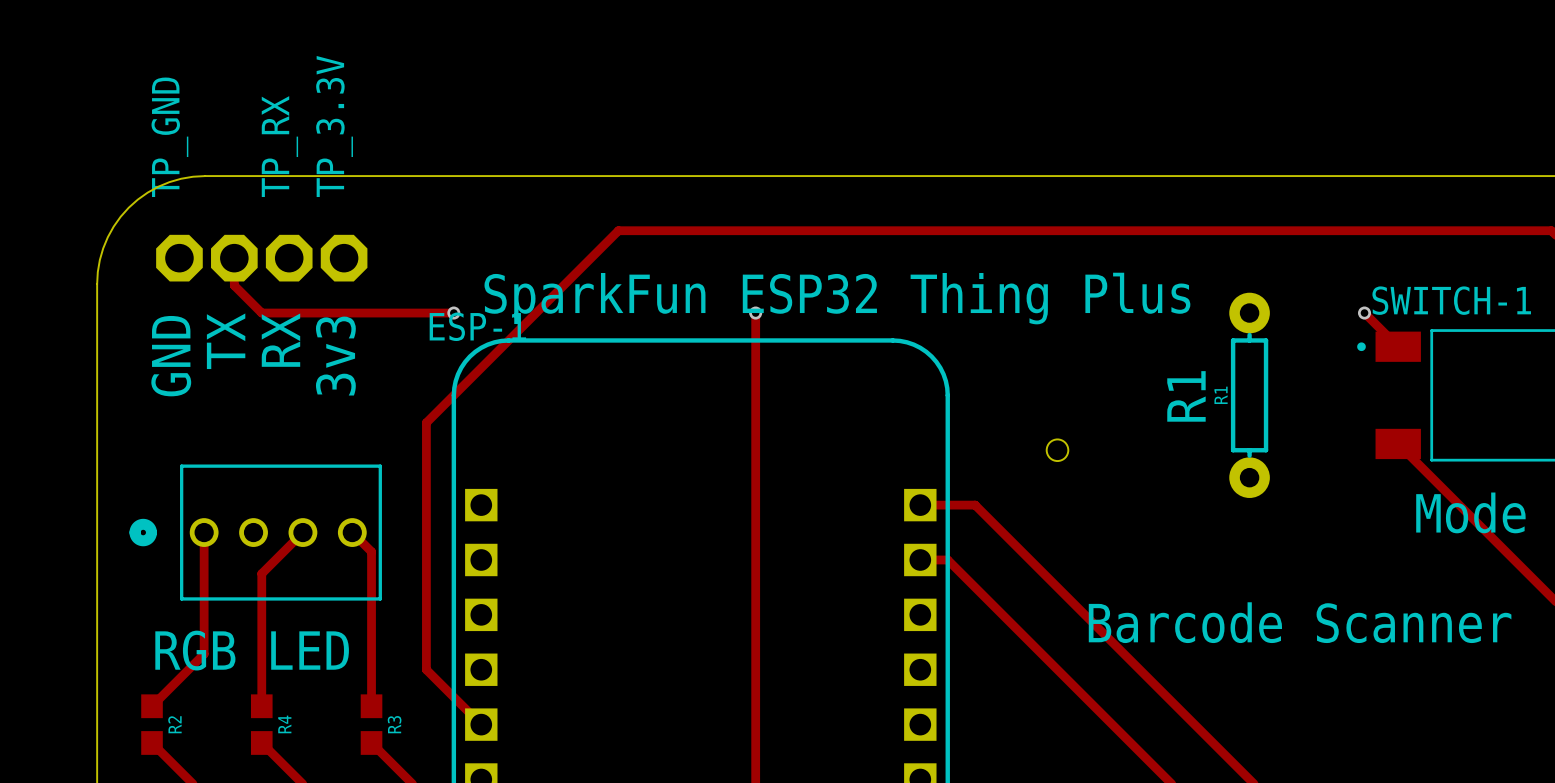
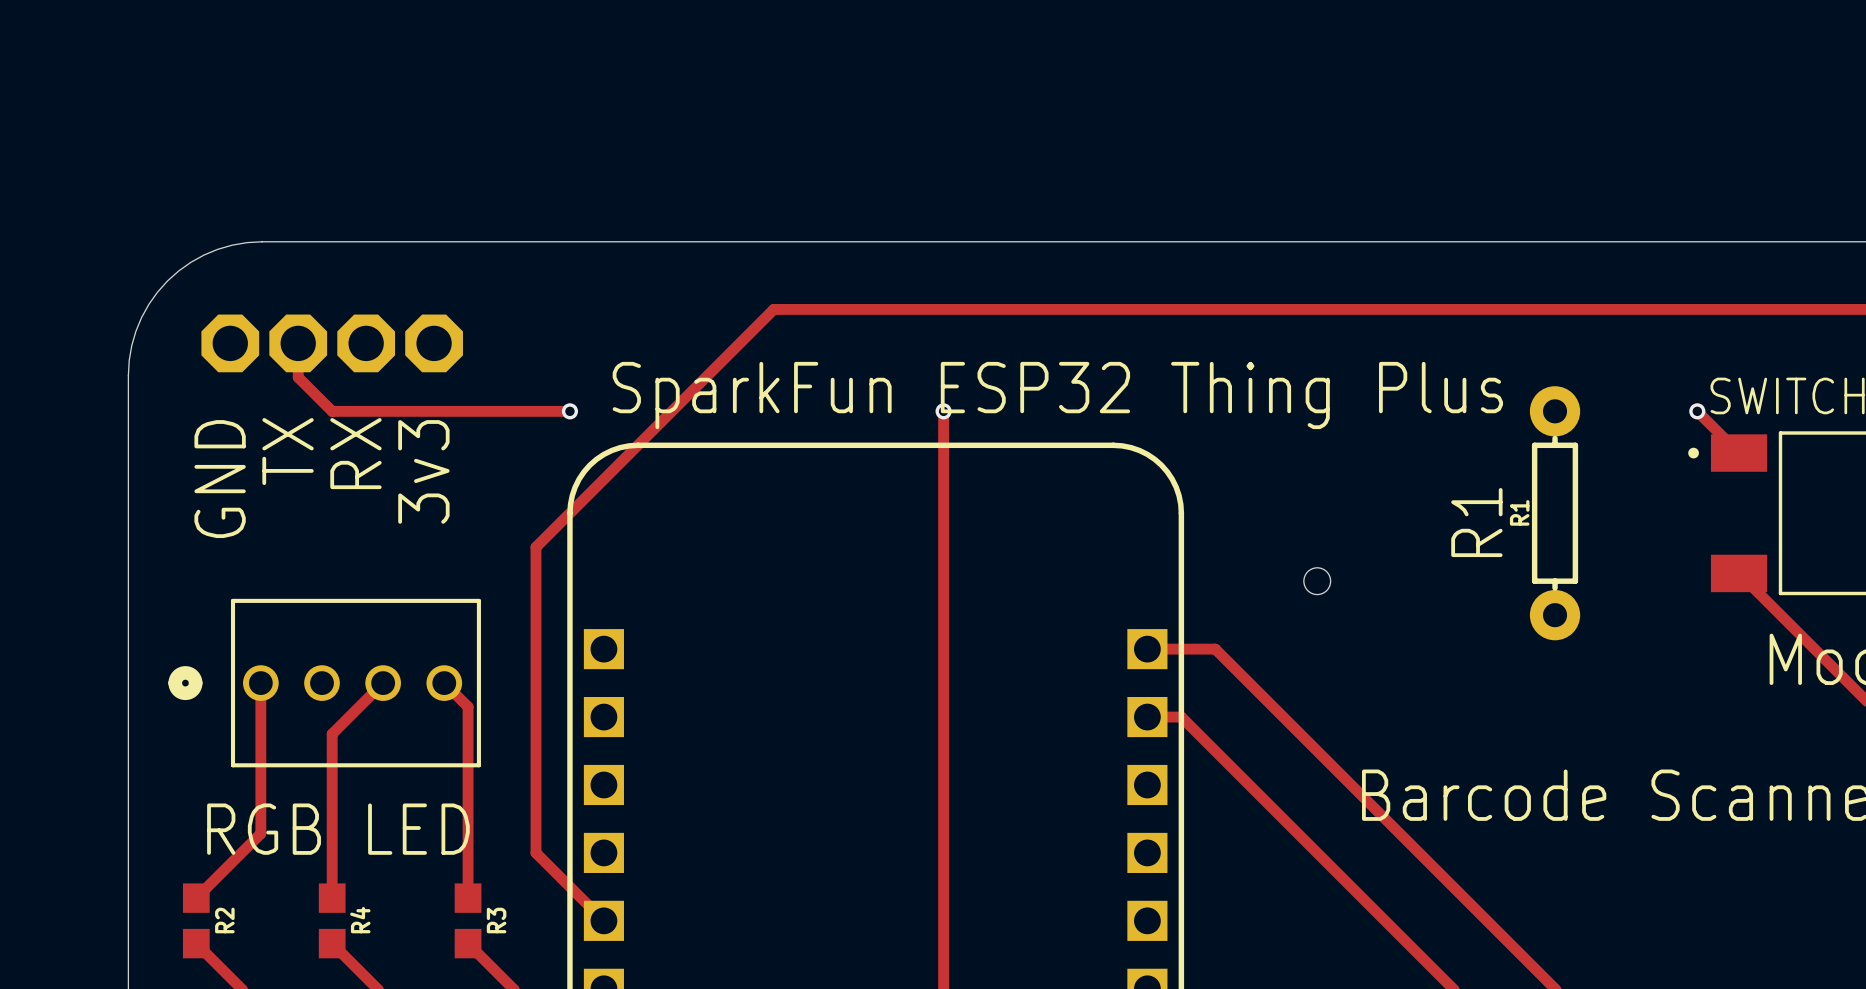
TP_3.3V name: TP_3.3V (334, 126) -> none
TP_GND name: TP_GND (169, 137) -> none
TP_RX name: TP_RX (279, 146) -> none
ESP-1 name: ESP-1 (477, 326) -> none

